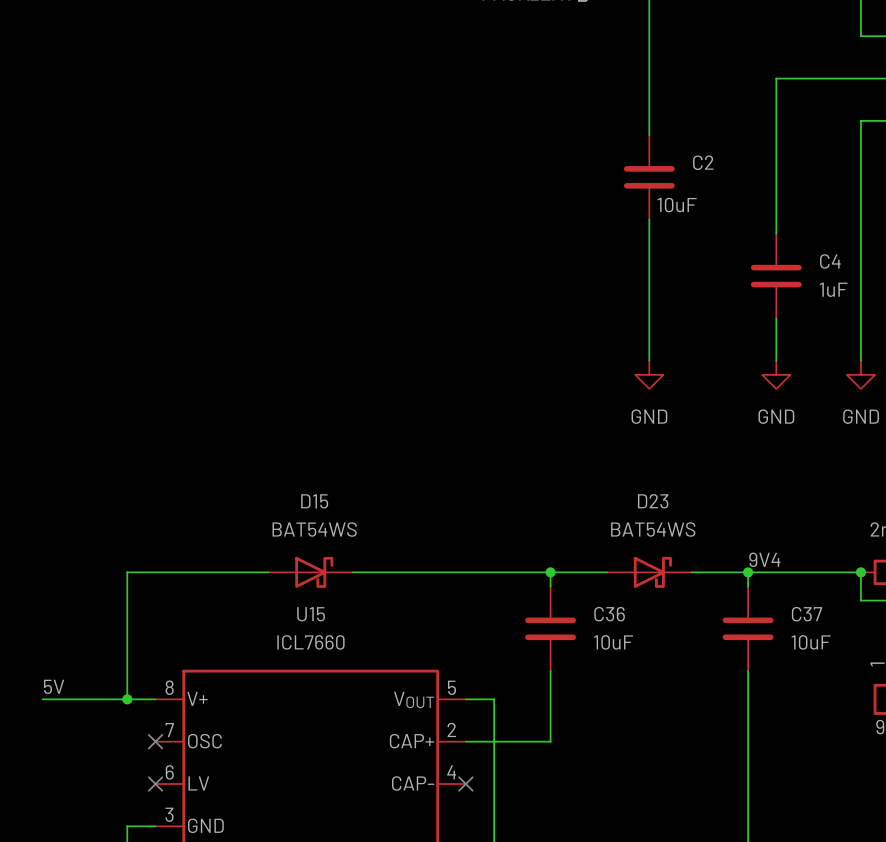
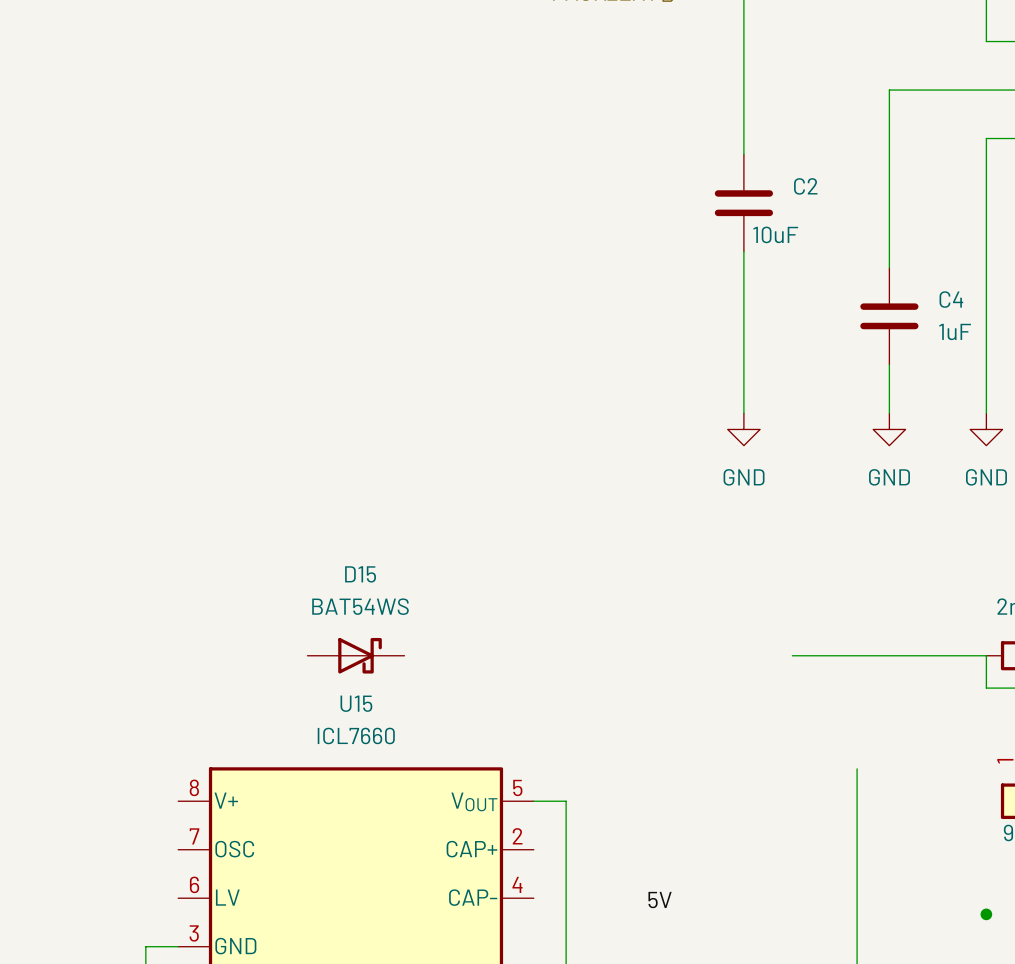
label: 9V4 (764, 559) -> none
wire: (268, 572) (127, 572) (127, 699) -> none
wire: (353, 572) (607, 572) -> none
wire: (550, 572) (550, 586) -> none
junction: (550, 572) -> none
D23: BAT54WS (649, 572) -> none
wire: (748, 572) (748, 586) -> none
junction: (748, 572) -> none
junction: (860, 572) -> none
C36: 10uF (550, 628) -> none
C37: 10uF (748, 628) -> none
wire: (550, 671) (550, 741) (465, 741) -> none
label: 5V (54, 686) -> none
wire: (42, 699) (155, 699) -> none
junction: (127, 699) -> none
no-connect mark: (155, 741) -> none
no-connect mark: (155, 784) -> none
no-connect mark: (465, 784) -> none
label: none -> 5V (660, 900)
junction: none -> (986, 914)

